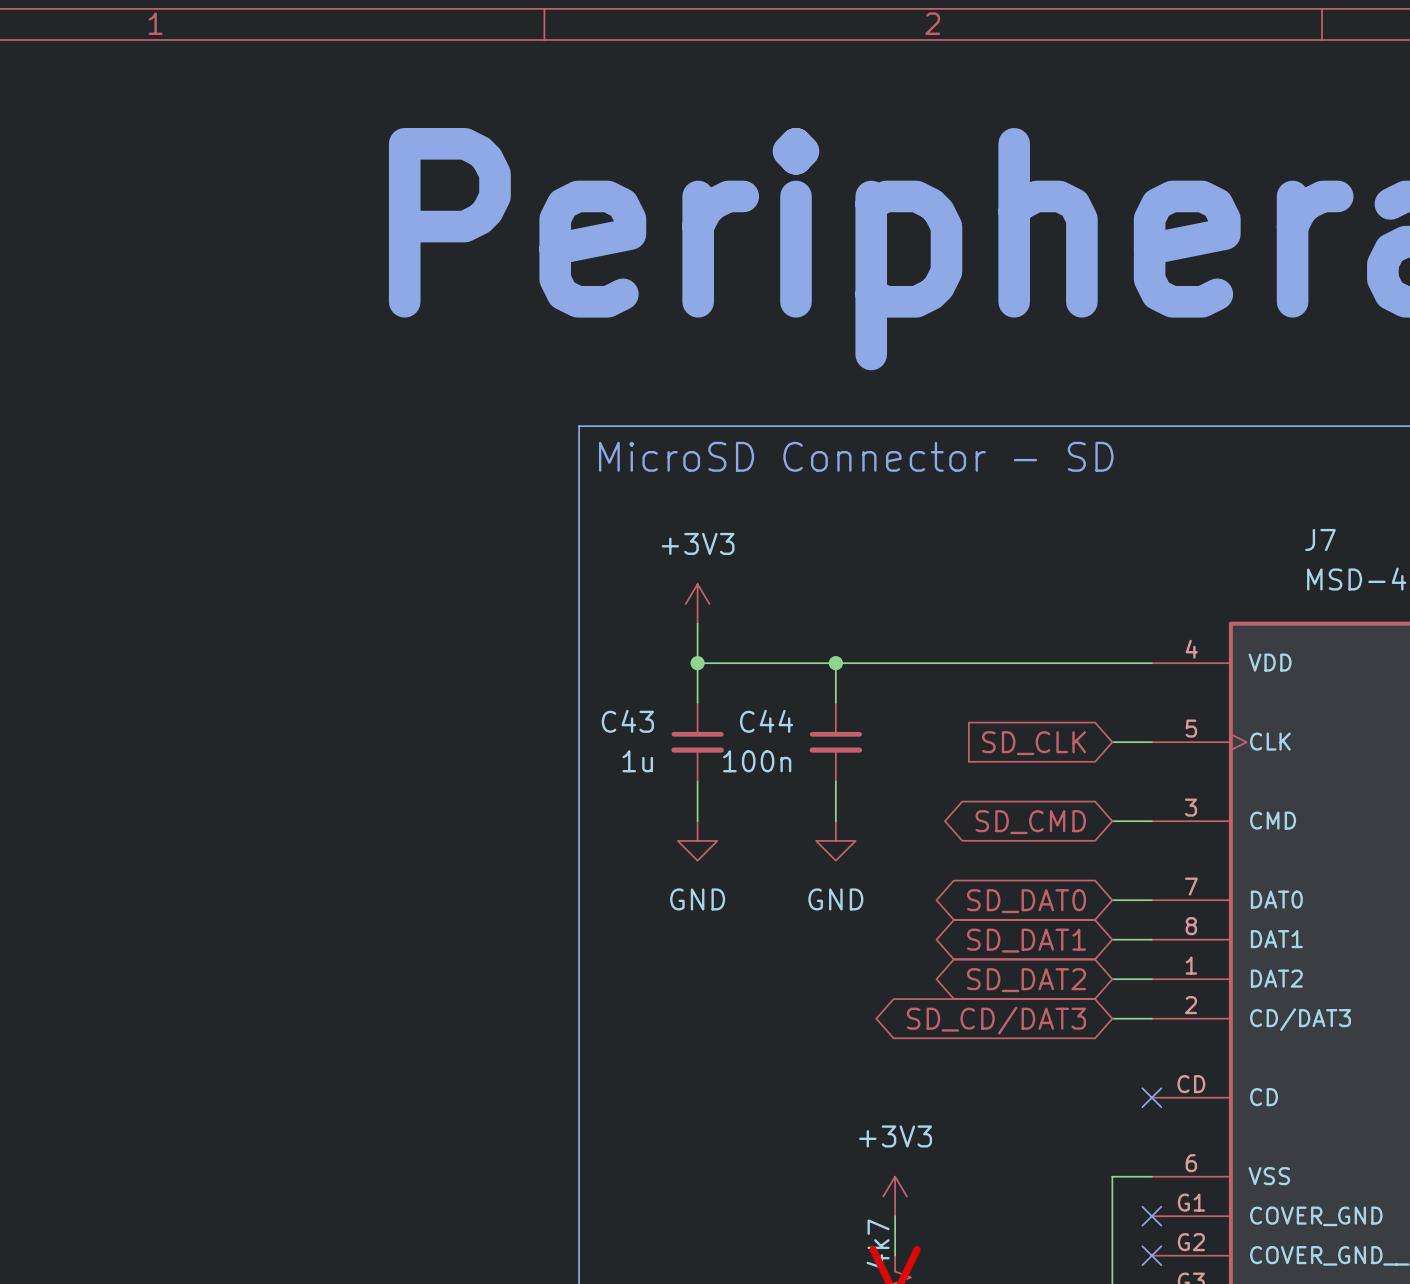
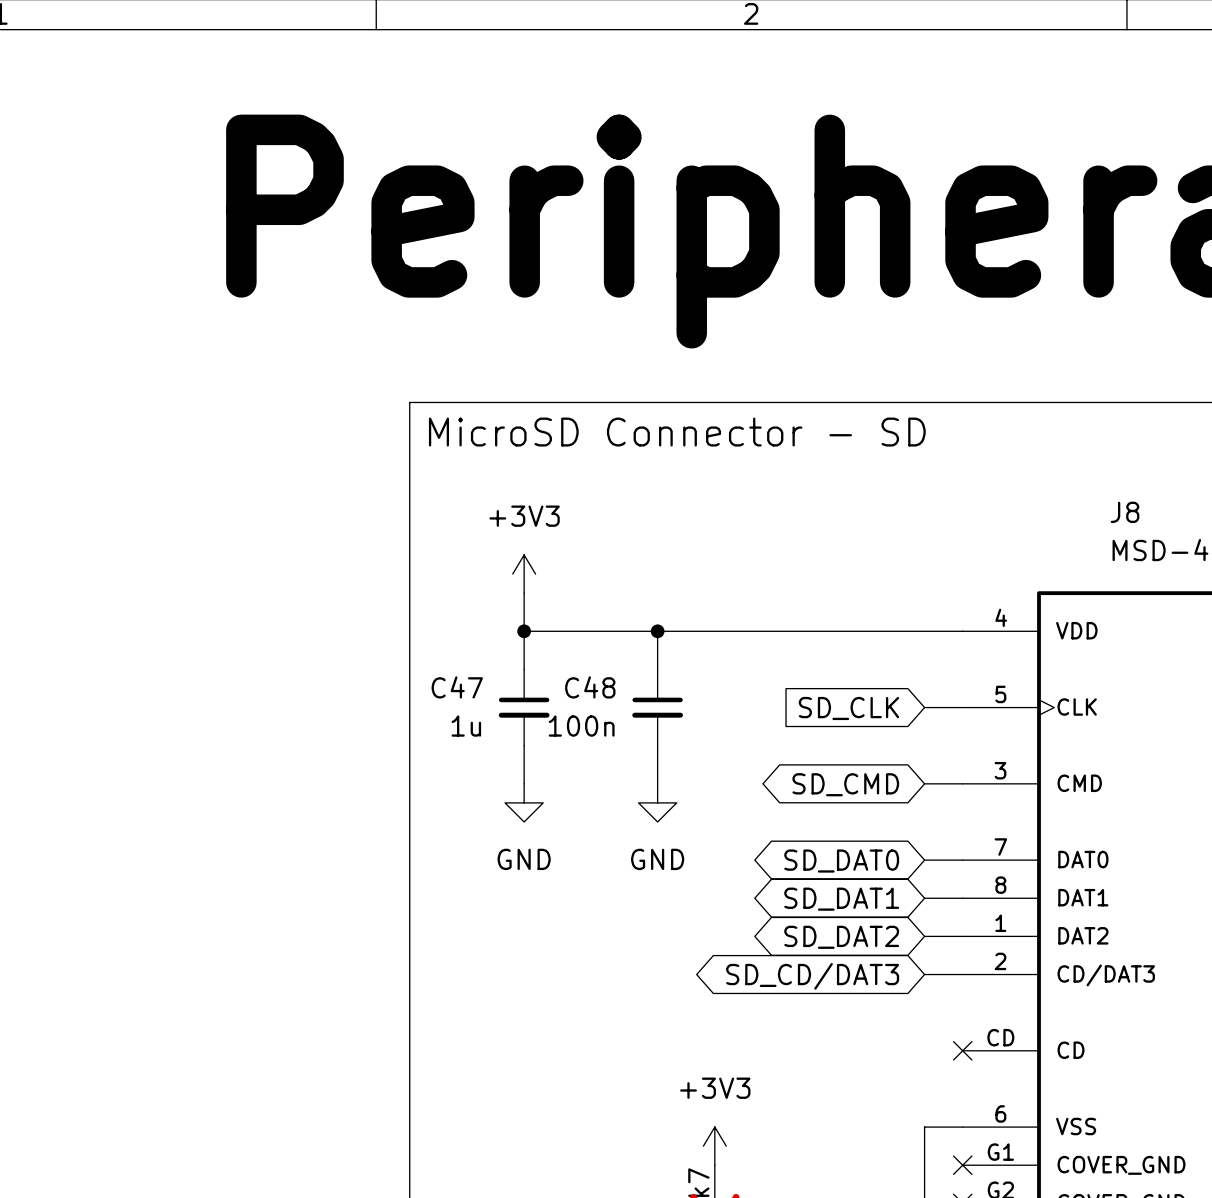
J7 name: J7 (1320, 539) -> J8 (1125, 512)
C43 name: C43 (627, 721) -> C47 (457, 687)
C44 name: C44 (766, 721) -> C48 (590, 687)

